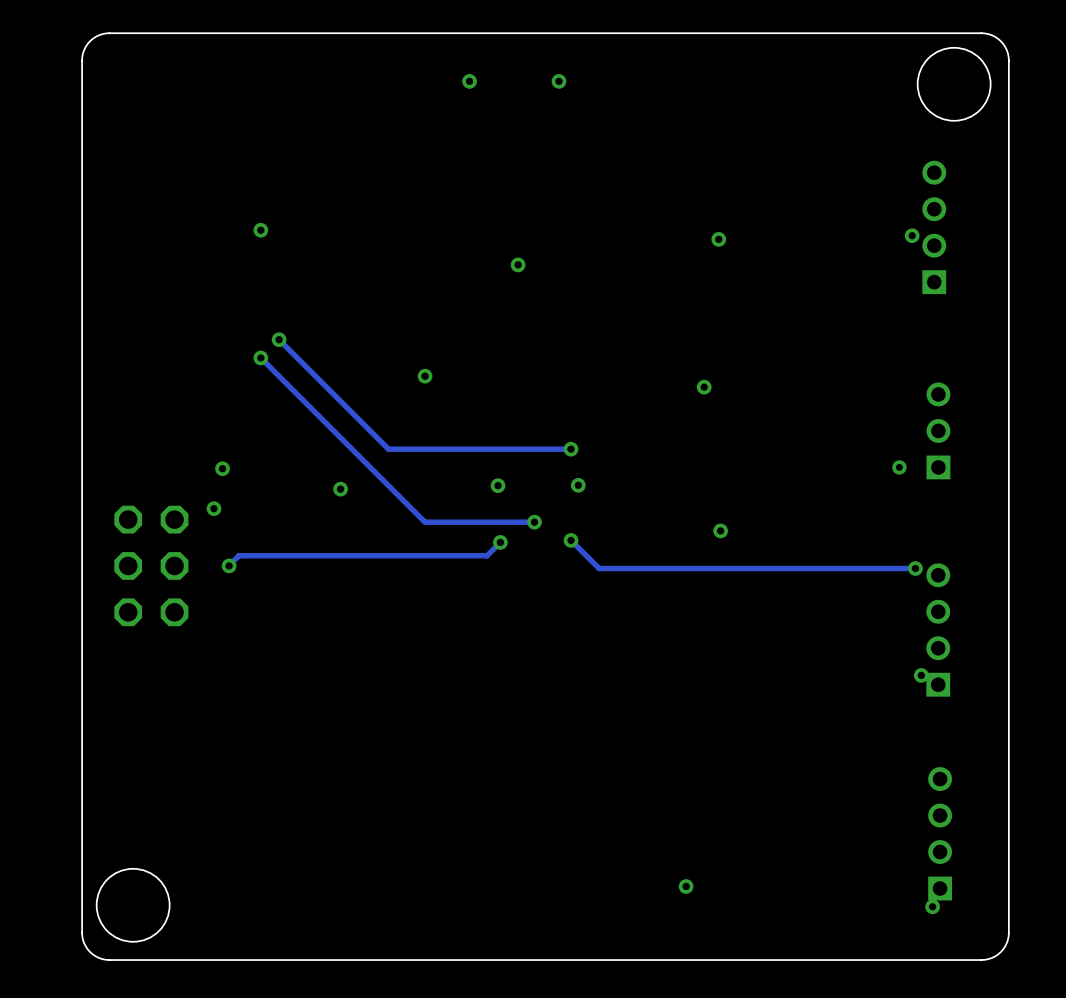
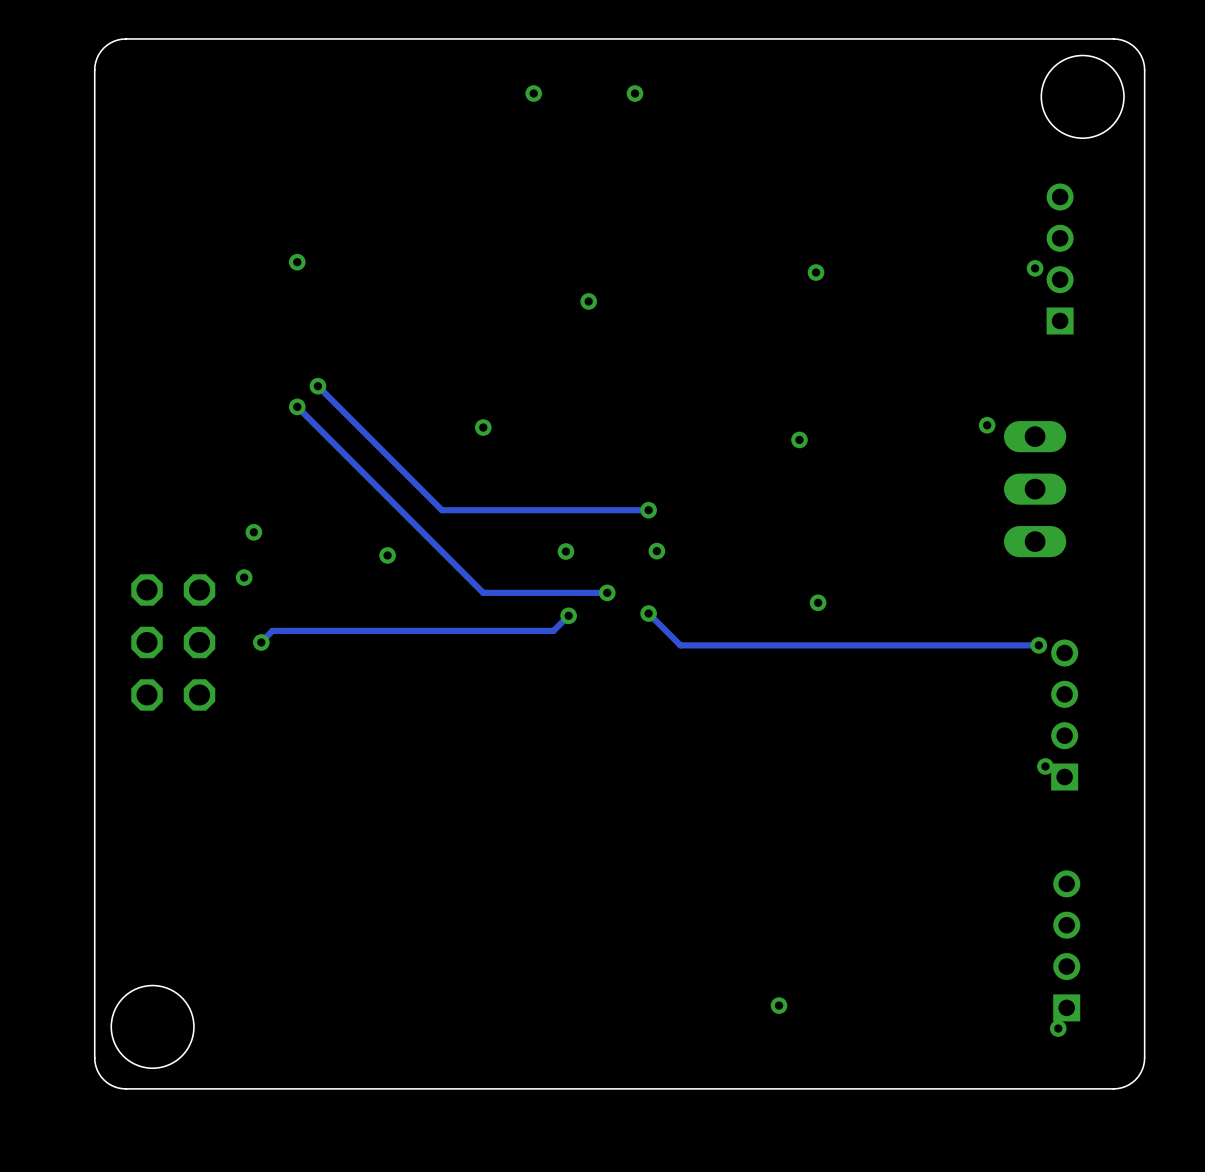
via: none -> (987, 425)
part: none -> (1035, 489)
part: (938, 430) -> none
via: (899, 467) -> none

